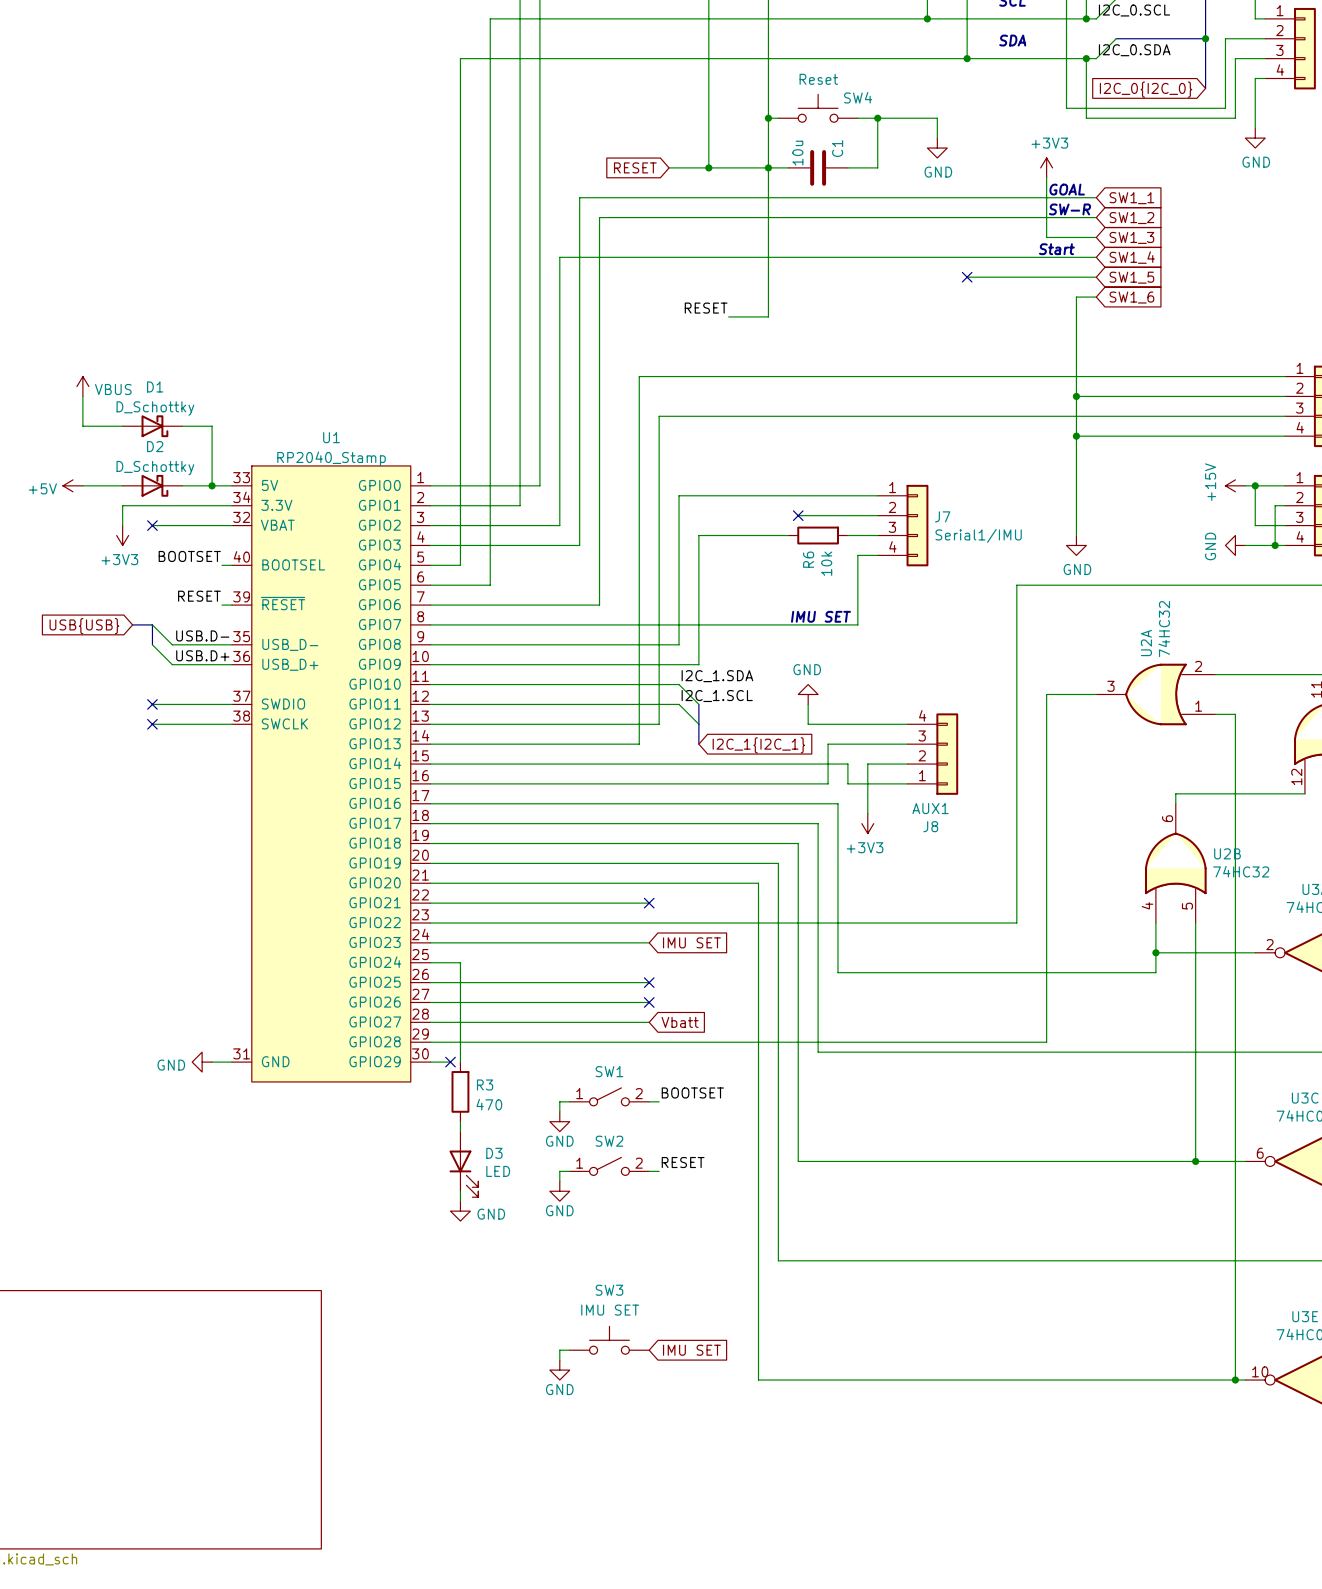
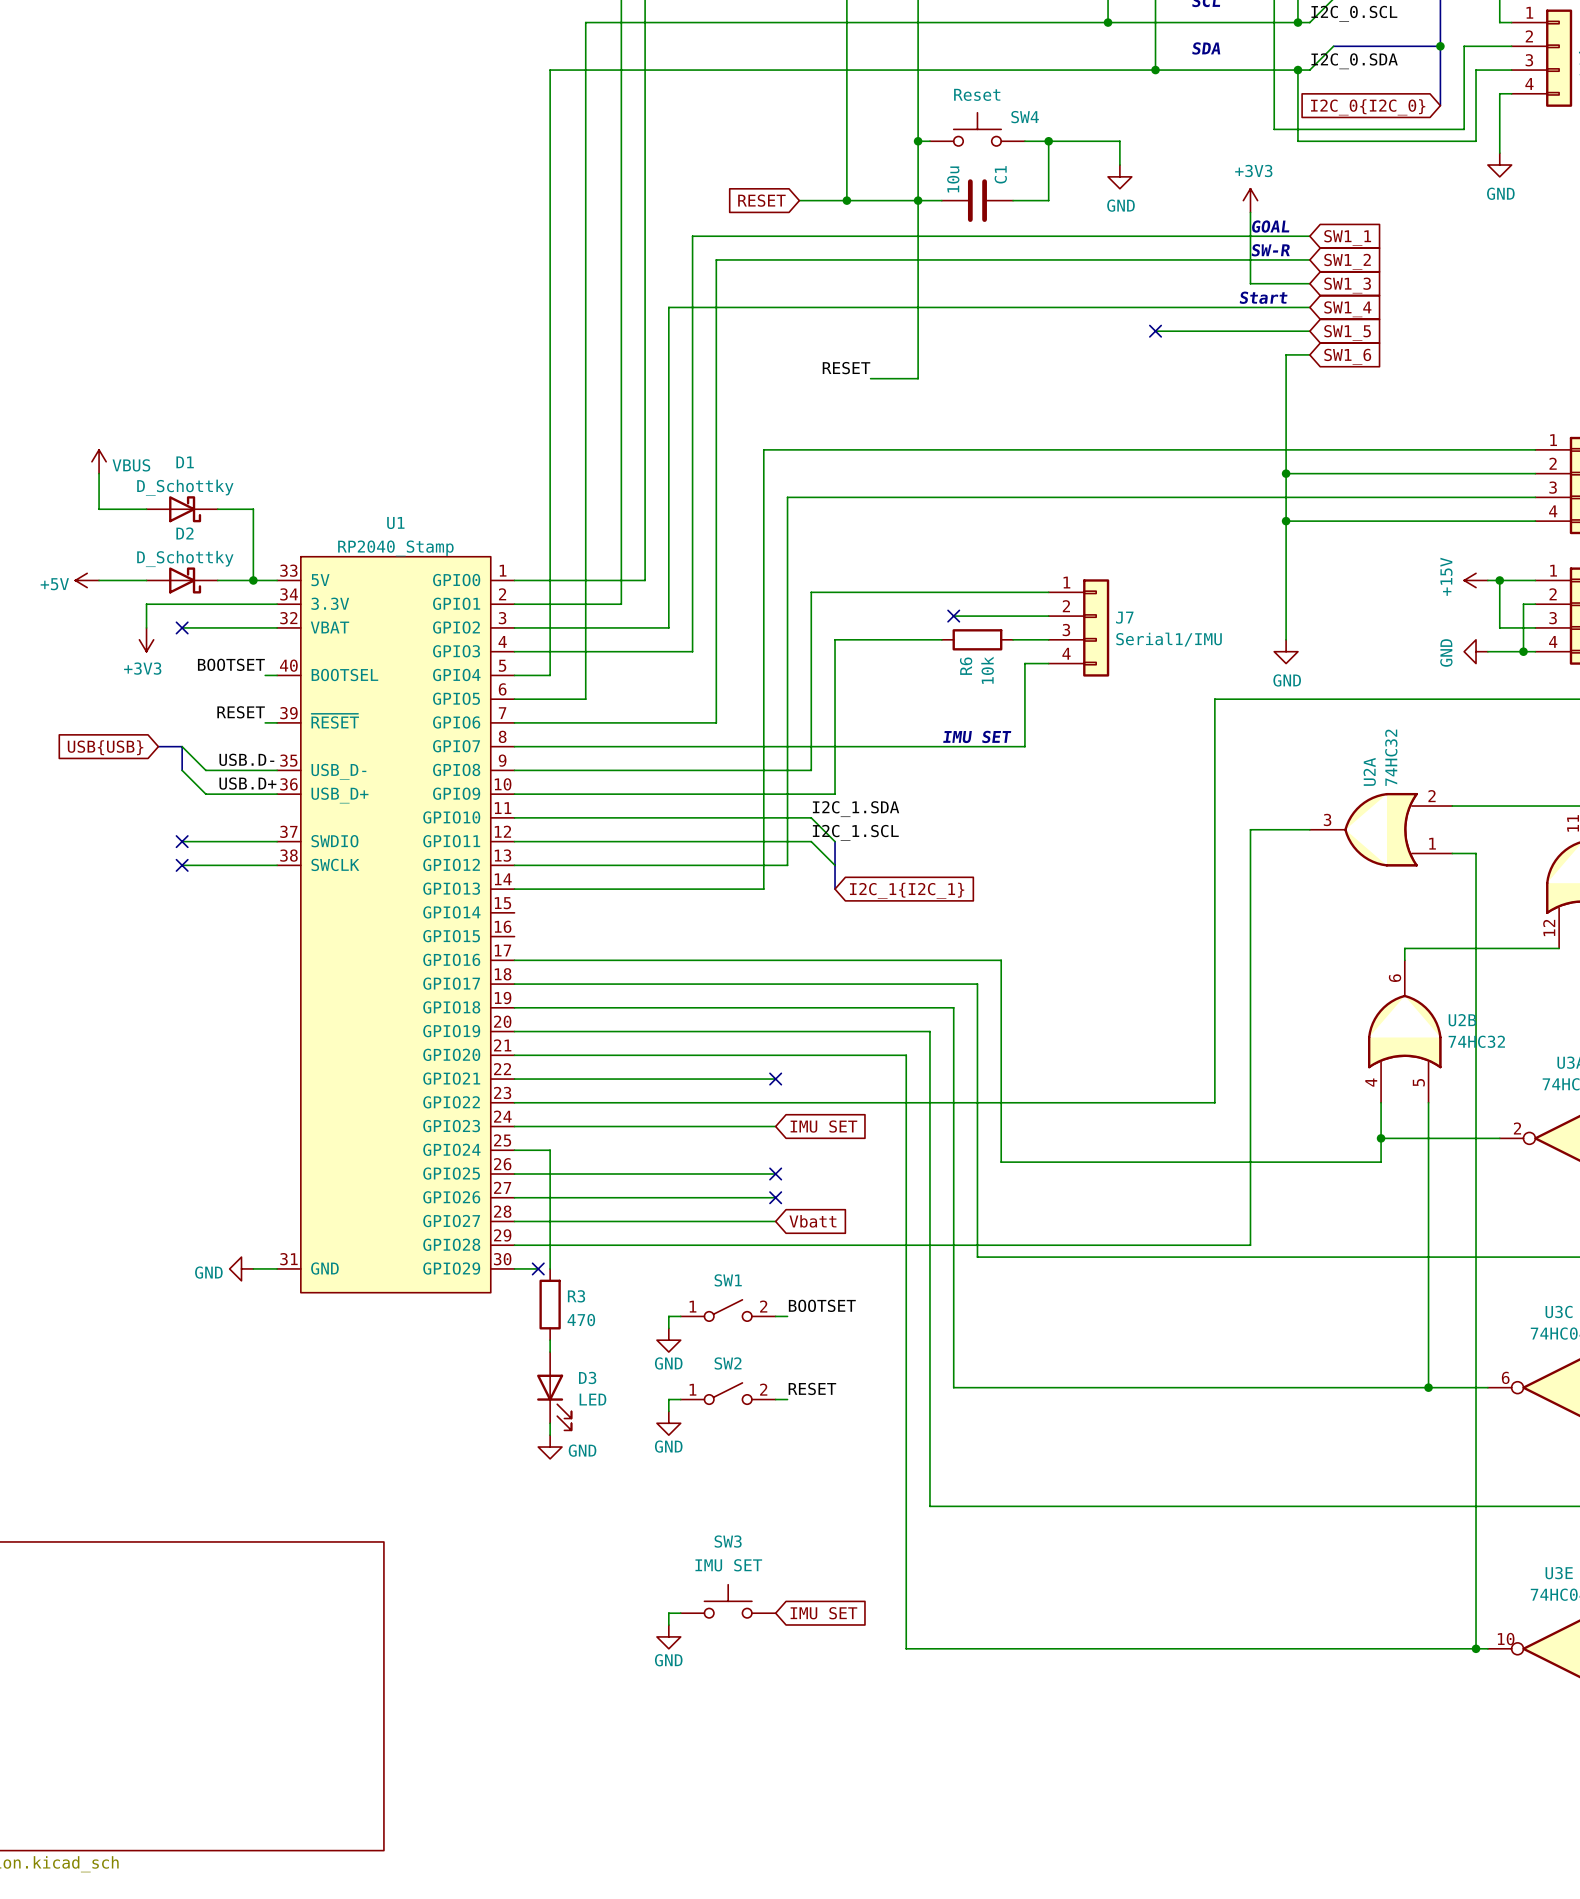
power symbol: GND (808, 694) -> none
wire: (808, 704) (808, 724) (907, 724) -> none
wire: (907, 744) (828, 744) (828, 783) (430, 783) -> none
J8: AUX1 (932, 754) -> none
wire: (430, 764) (847, 764) (847, 783) (907, 783) -> none
wire: (907, 764) (867, 764) (867, 813) -> none
power symbol: +3V3 (867, 823) -> none

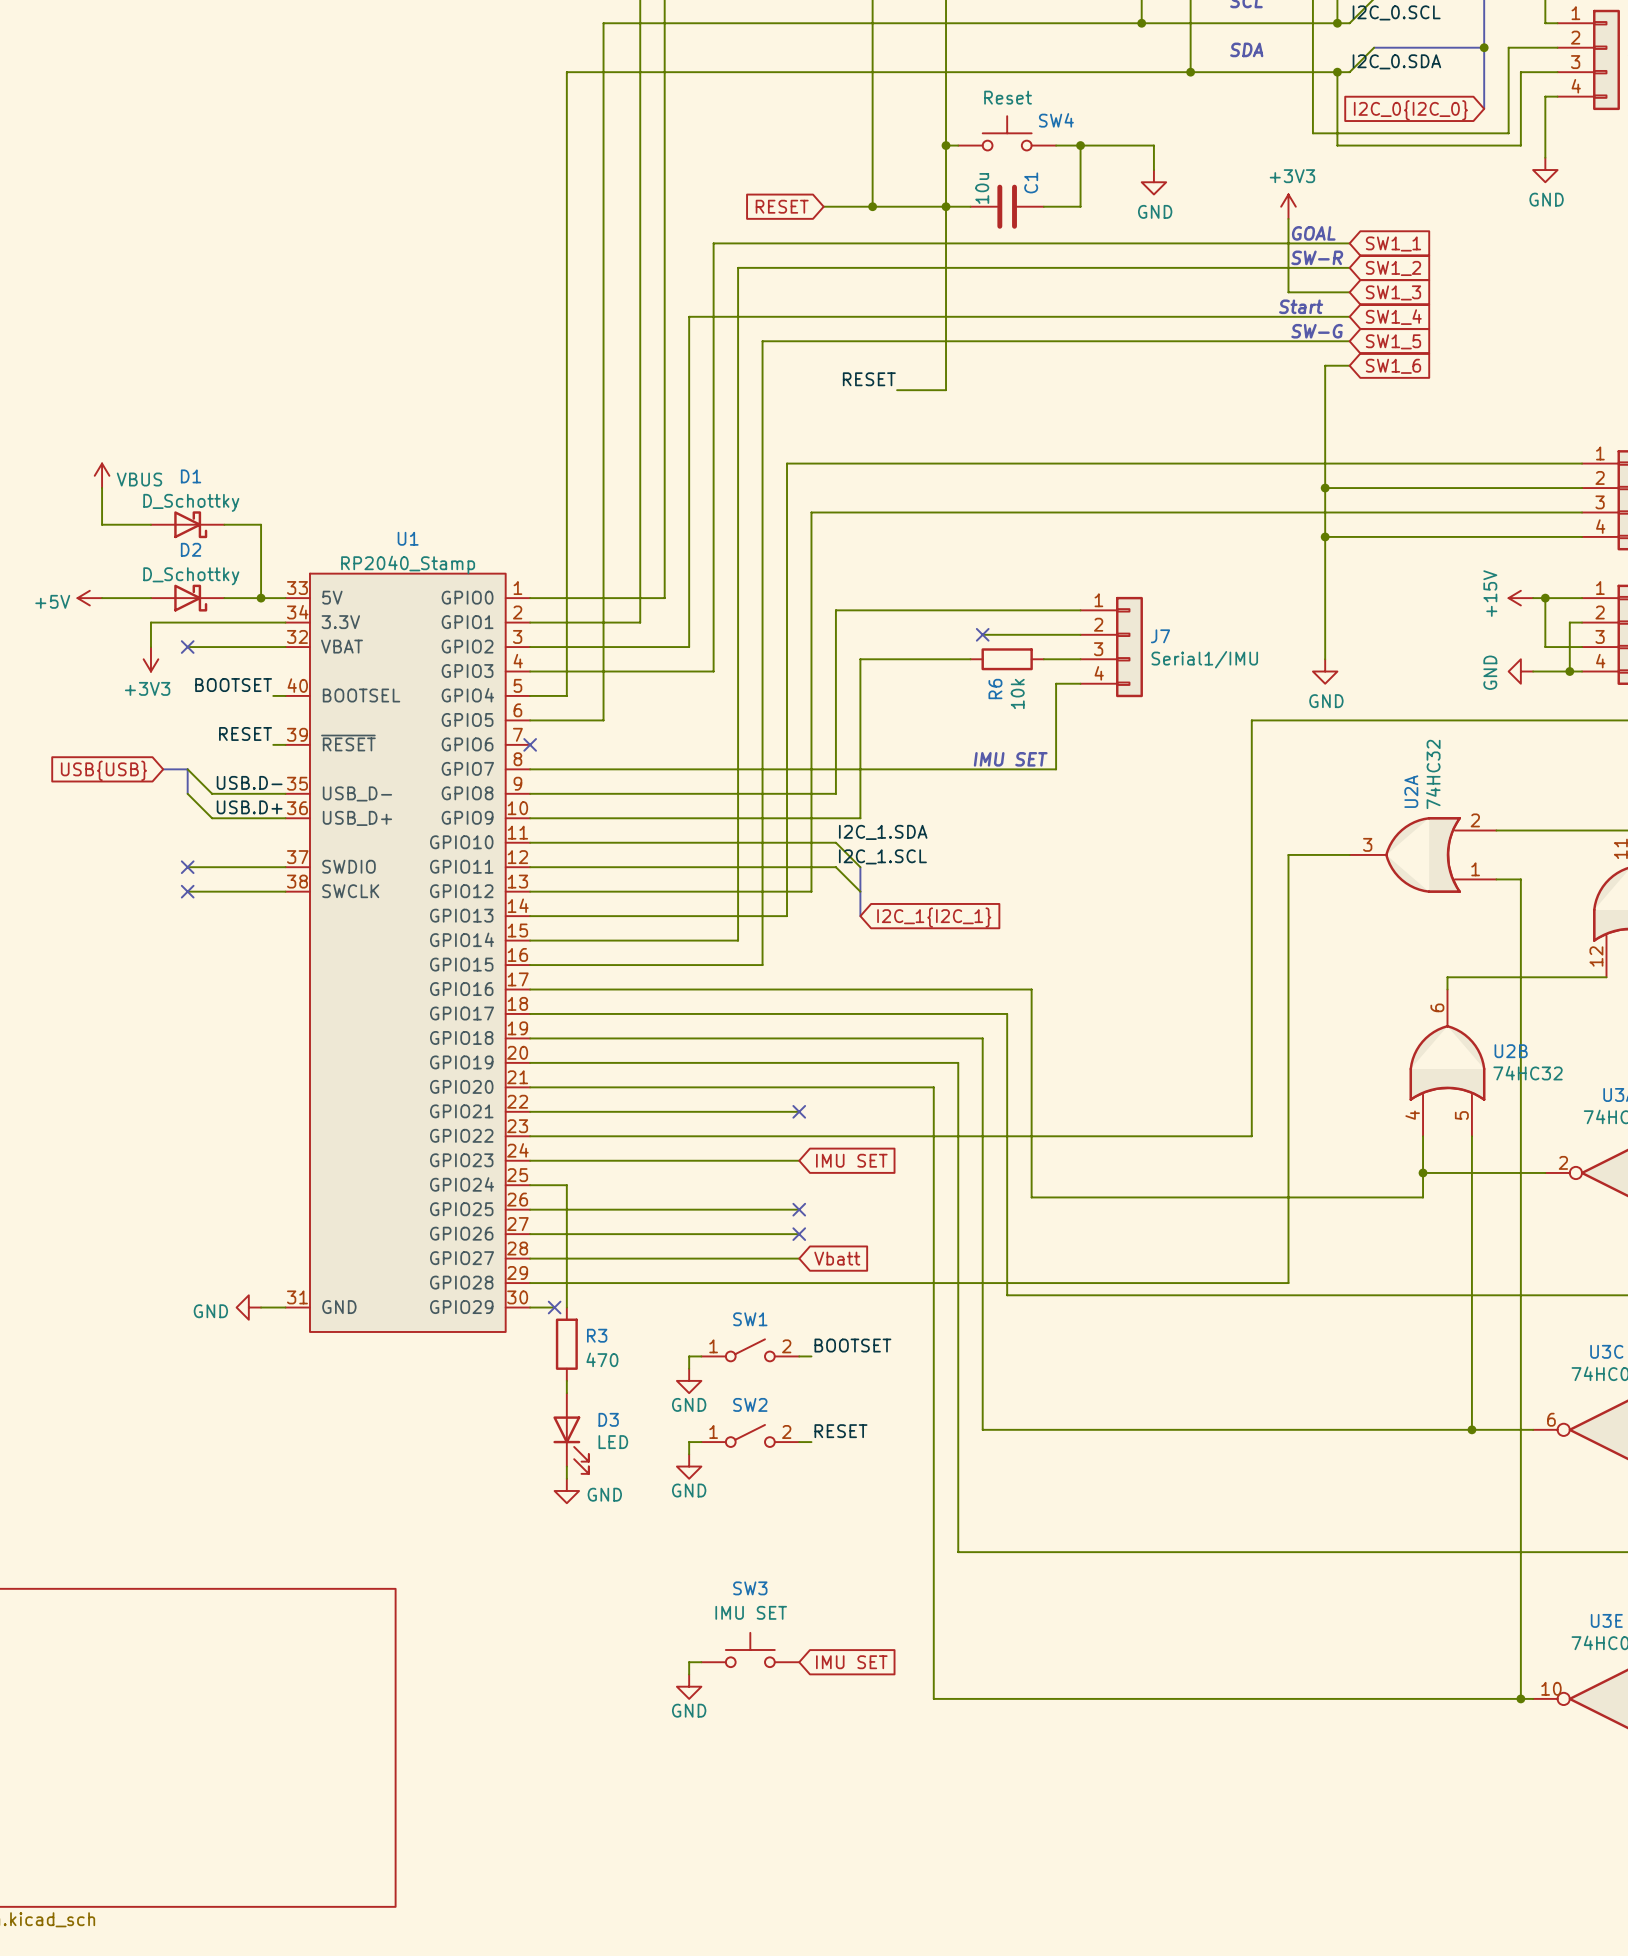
text: none -> SW-G (1317, 331)
wire: none -> (1190, 341) (762, 341) (762, 965) (530, 965)
no-connect mark: (1155, 331) -> none
wire: (514, 722) (716, 722) -> (530, 940) (738, 940) (738, 744)
no-connect mark: none -> (530, 744)

